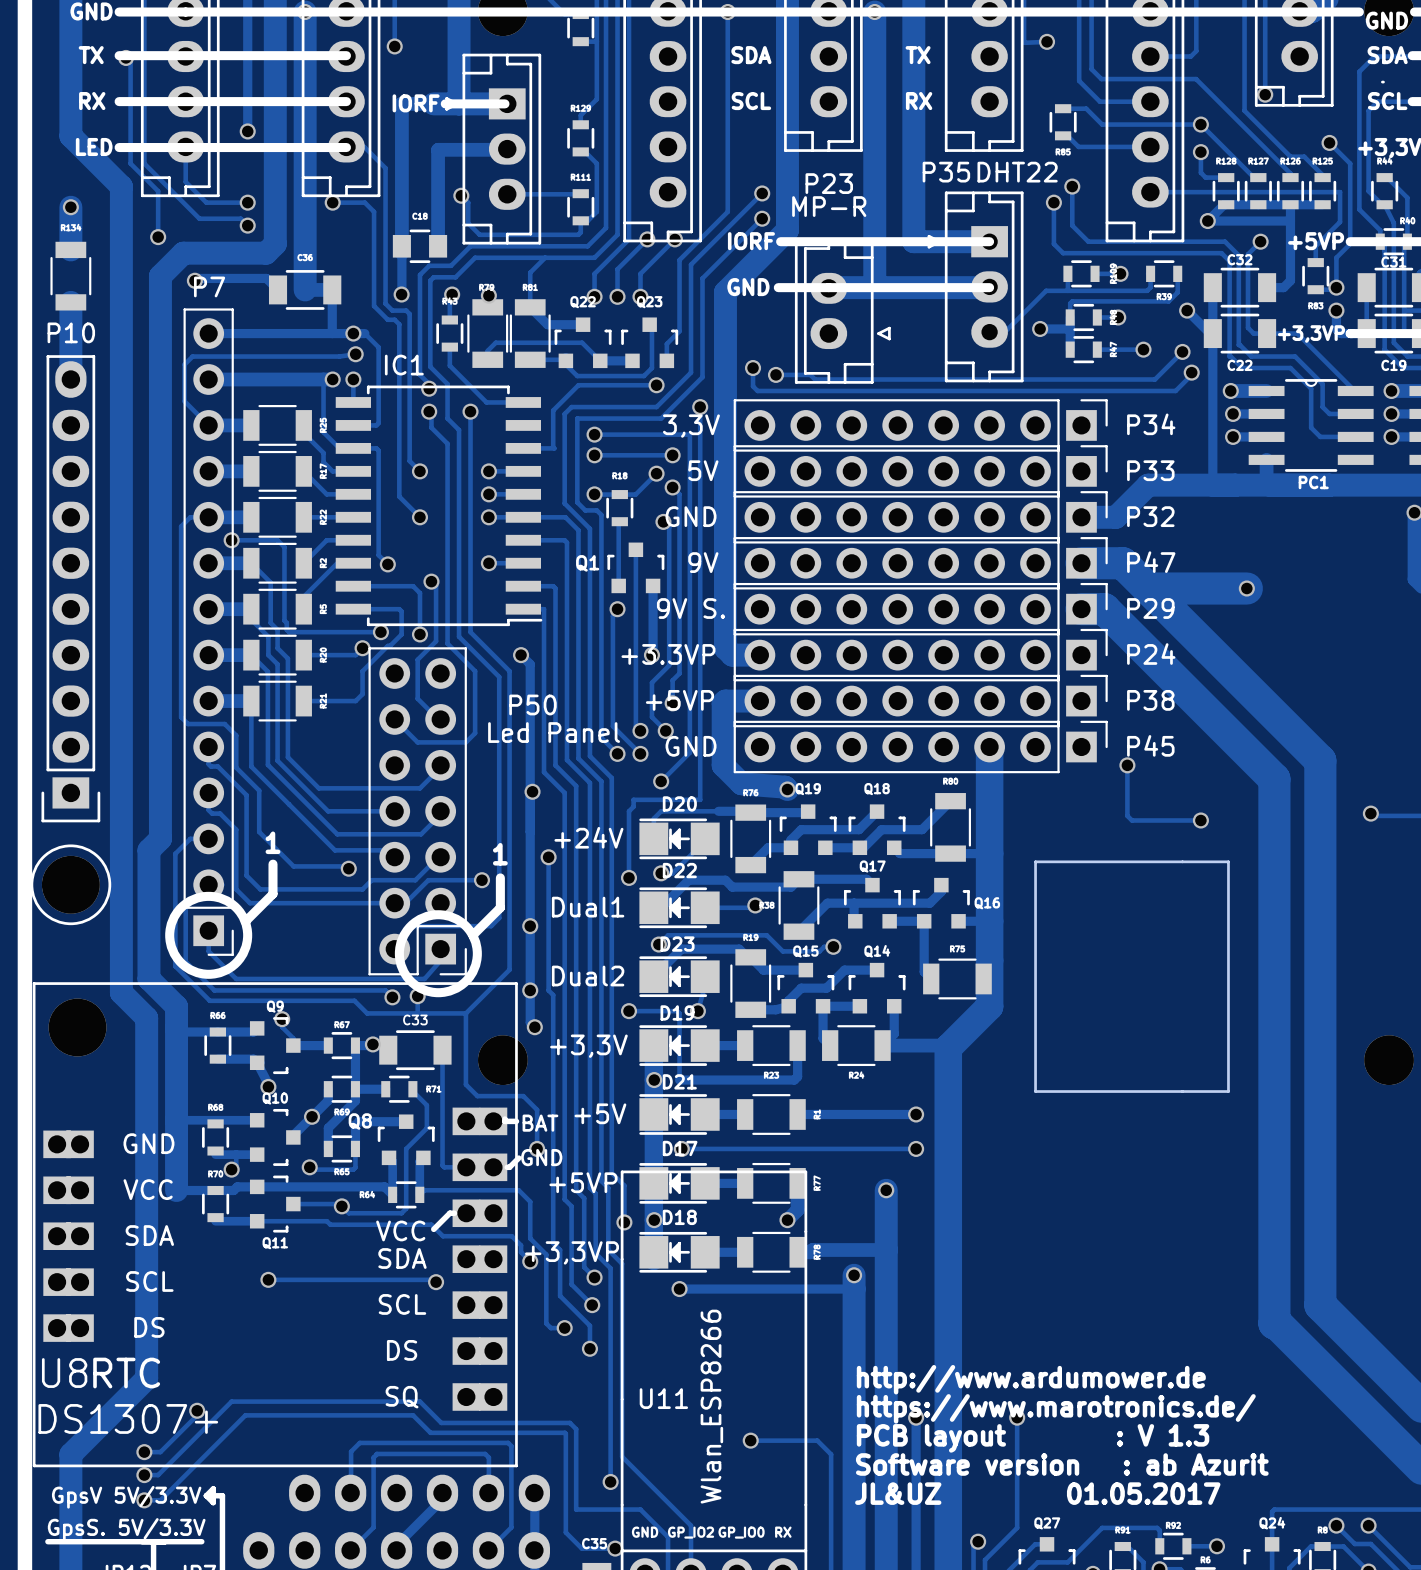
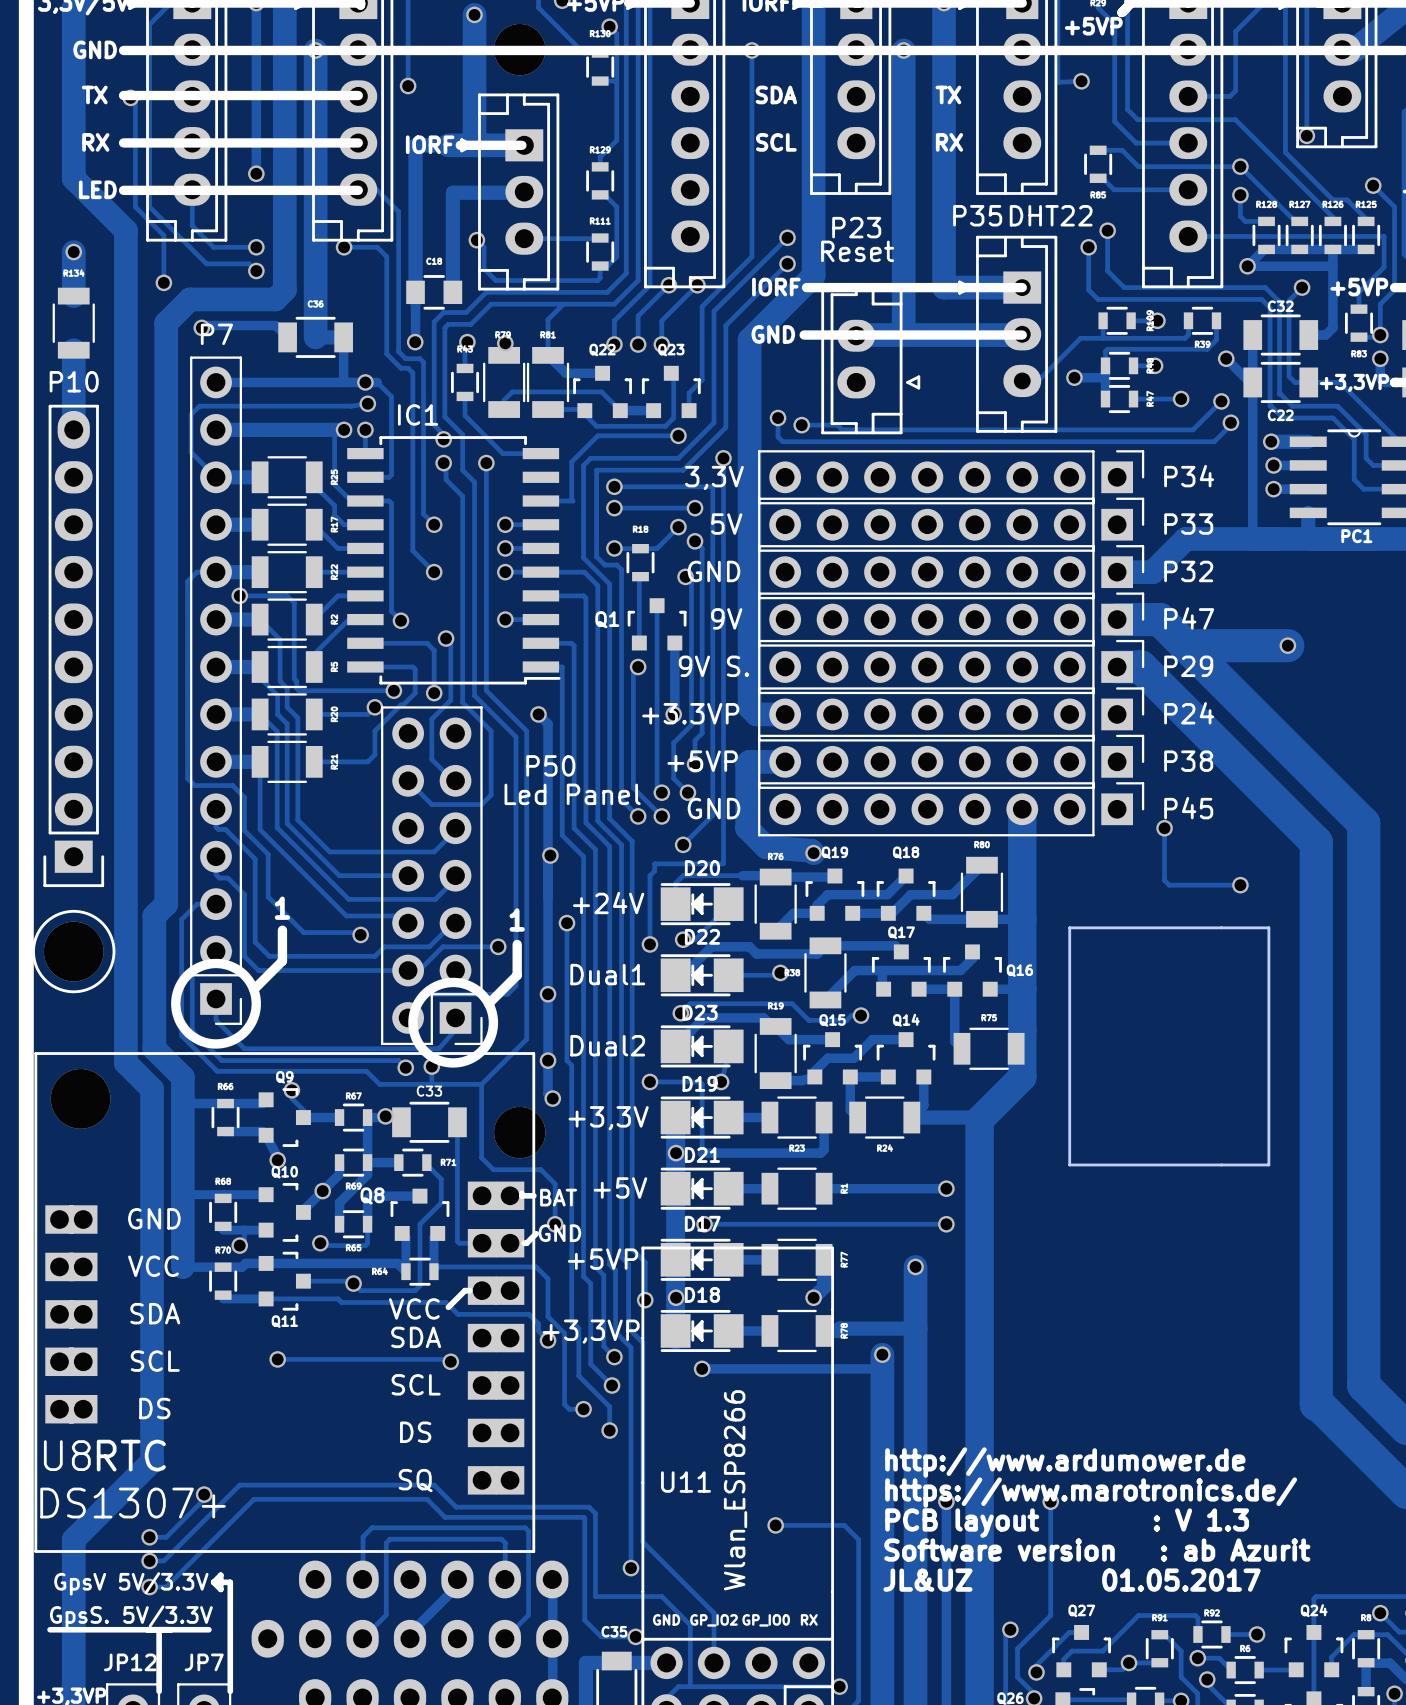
P23 value: MP-R (829, 206) -> Reset (857, 251)

